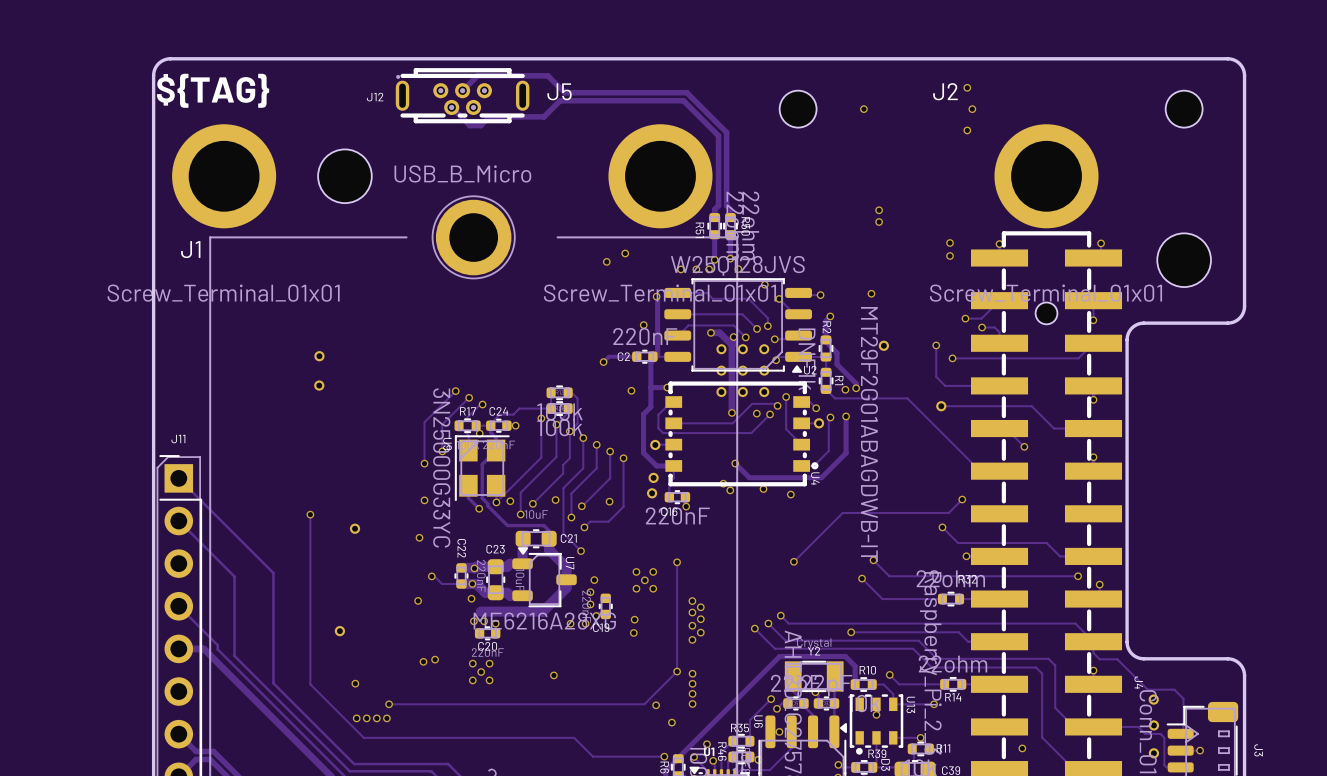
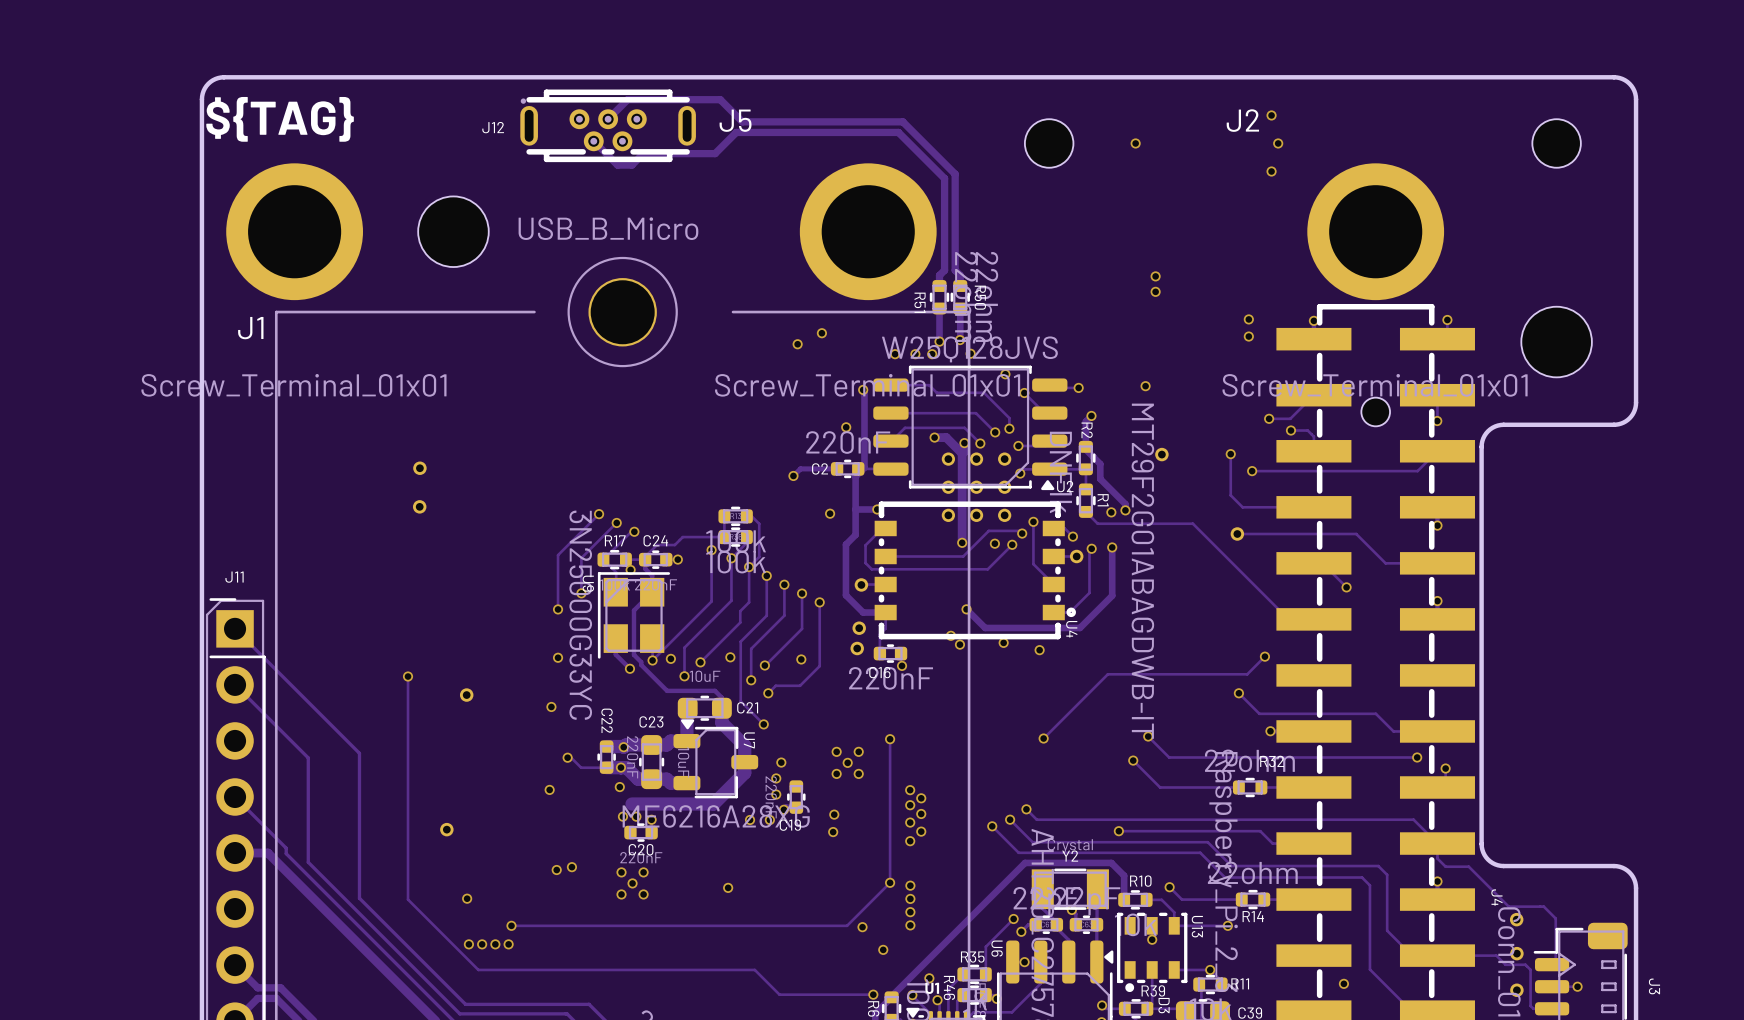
part footprint: [435, 199, 512, 276] -> [588, 278, 657, 347]

